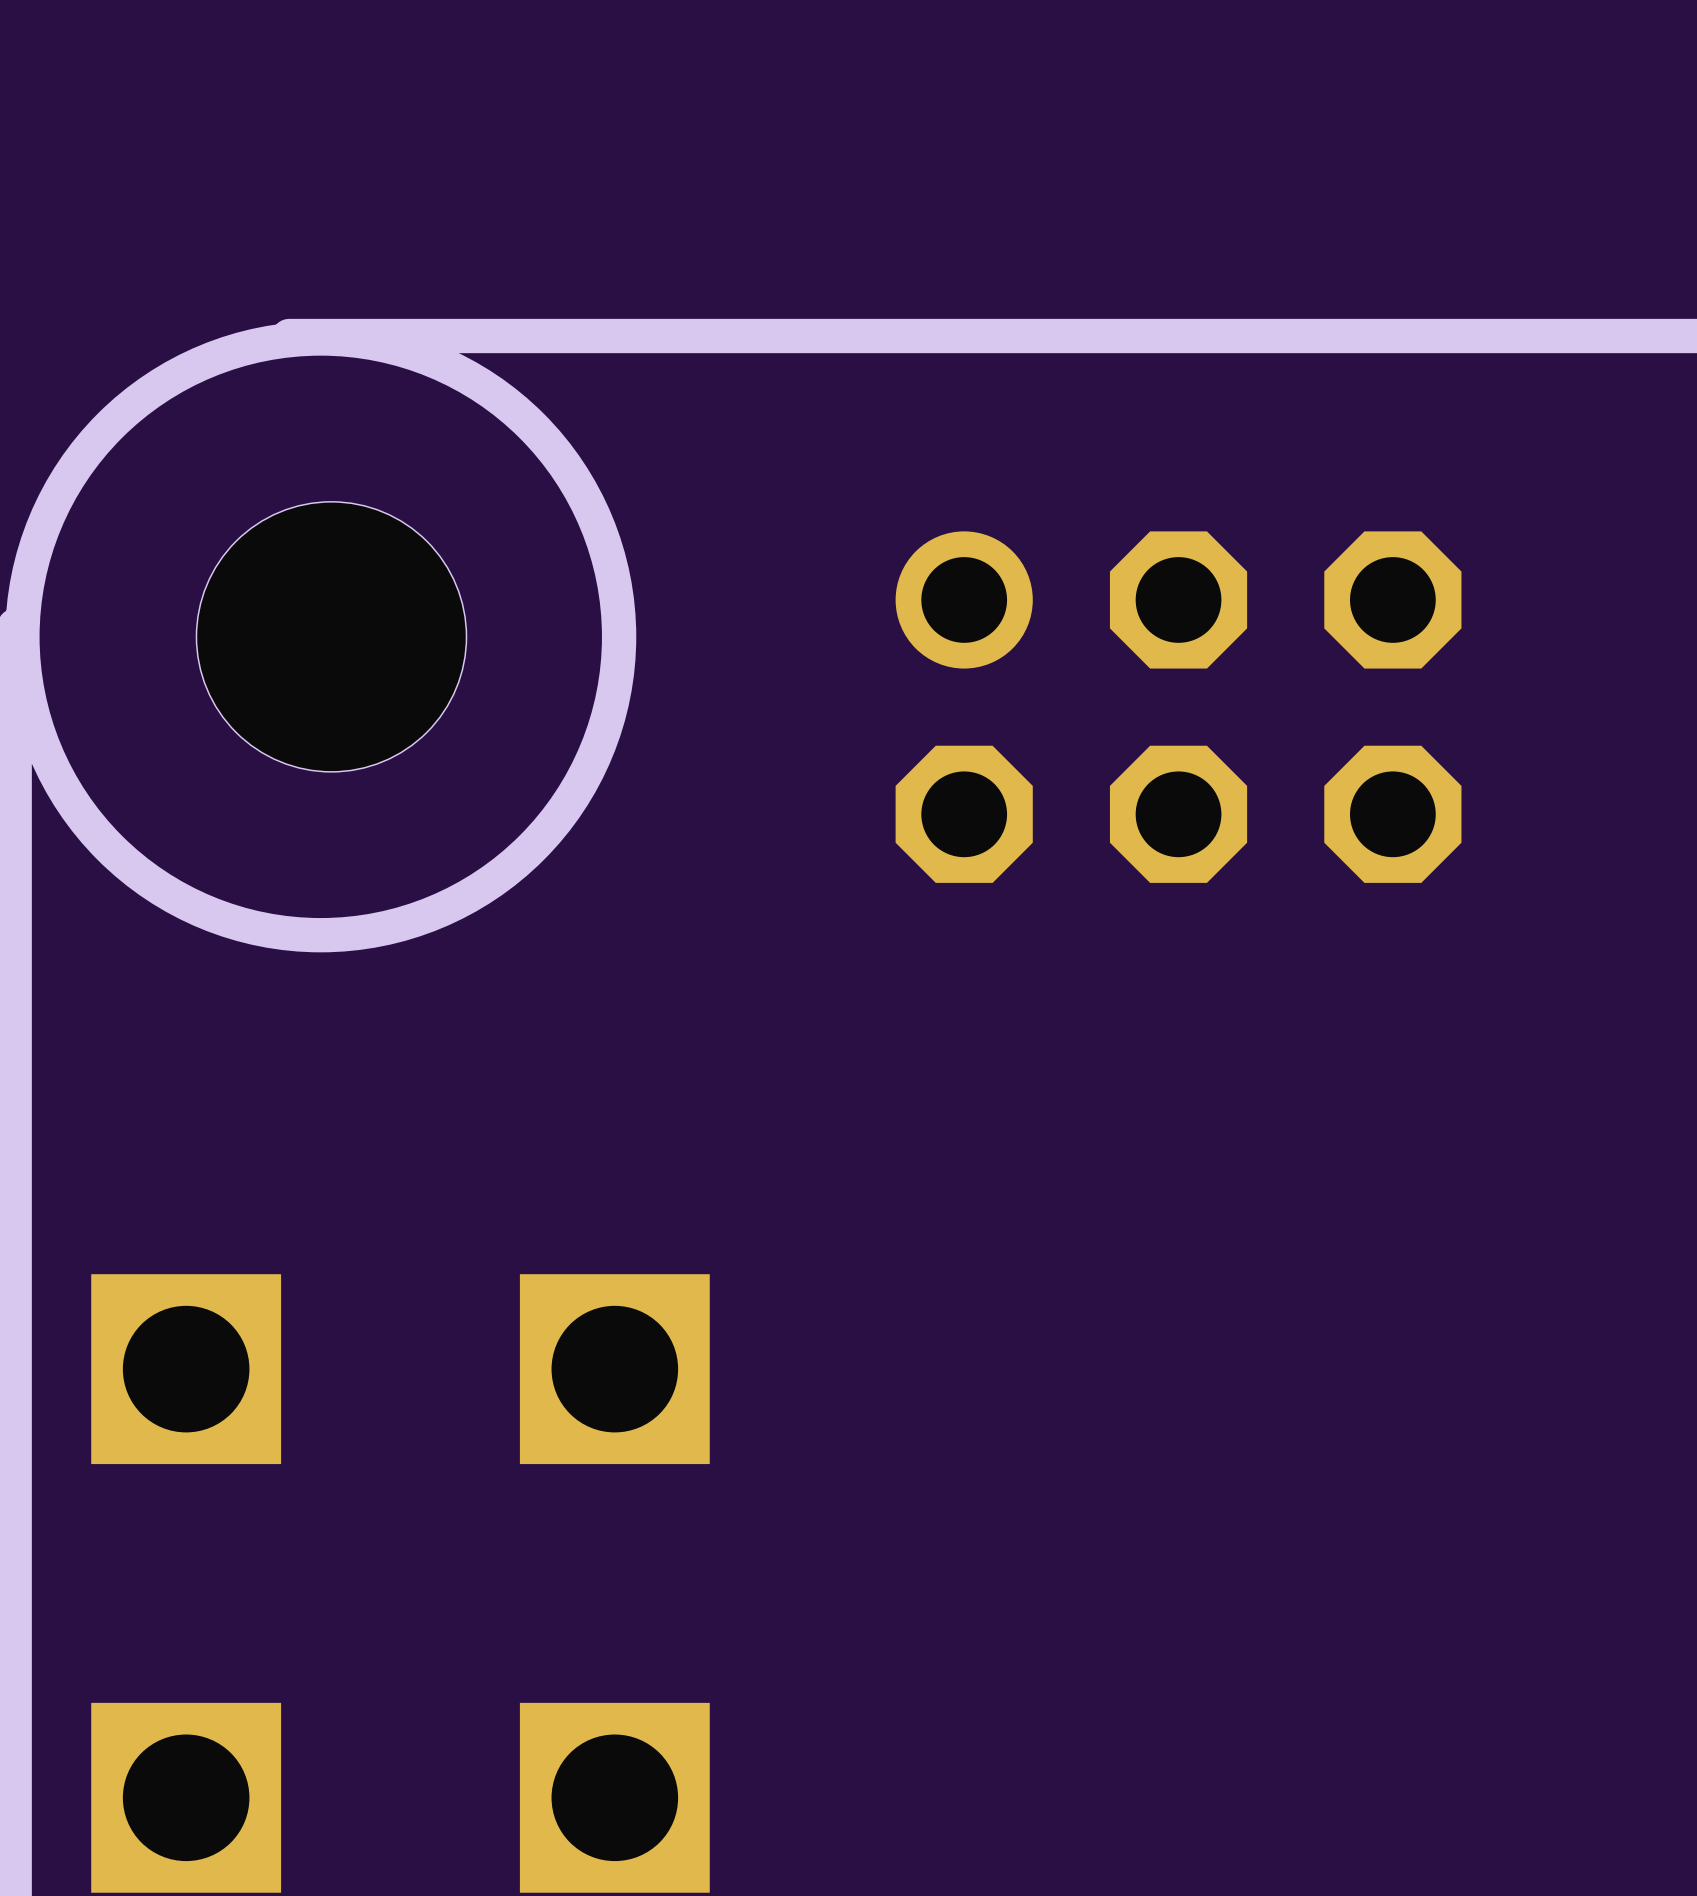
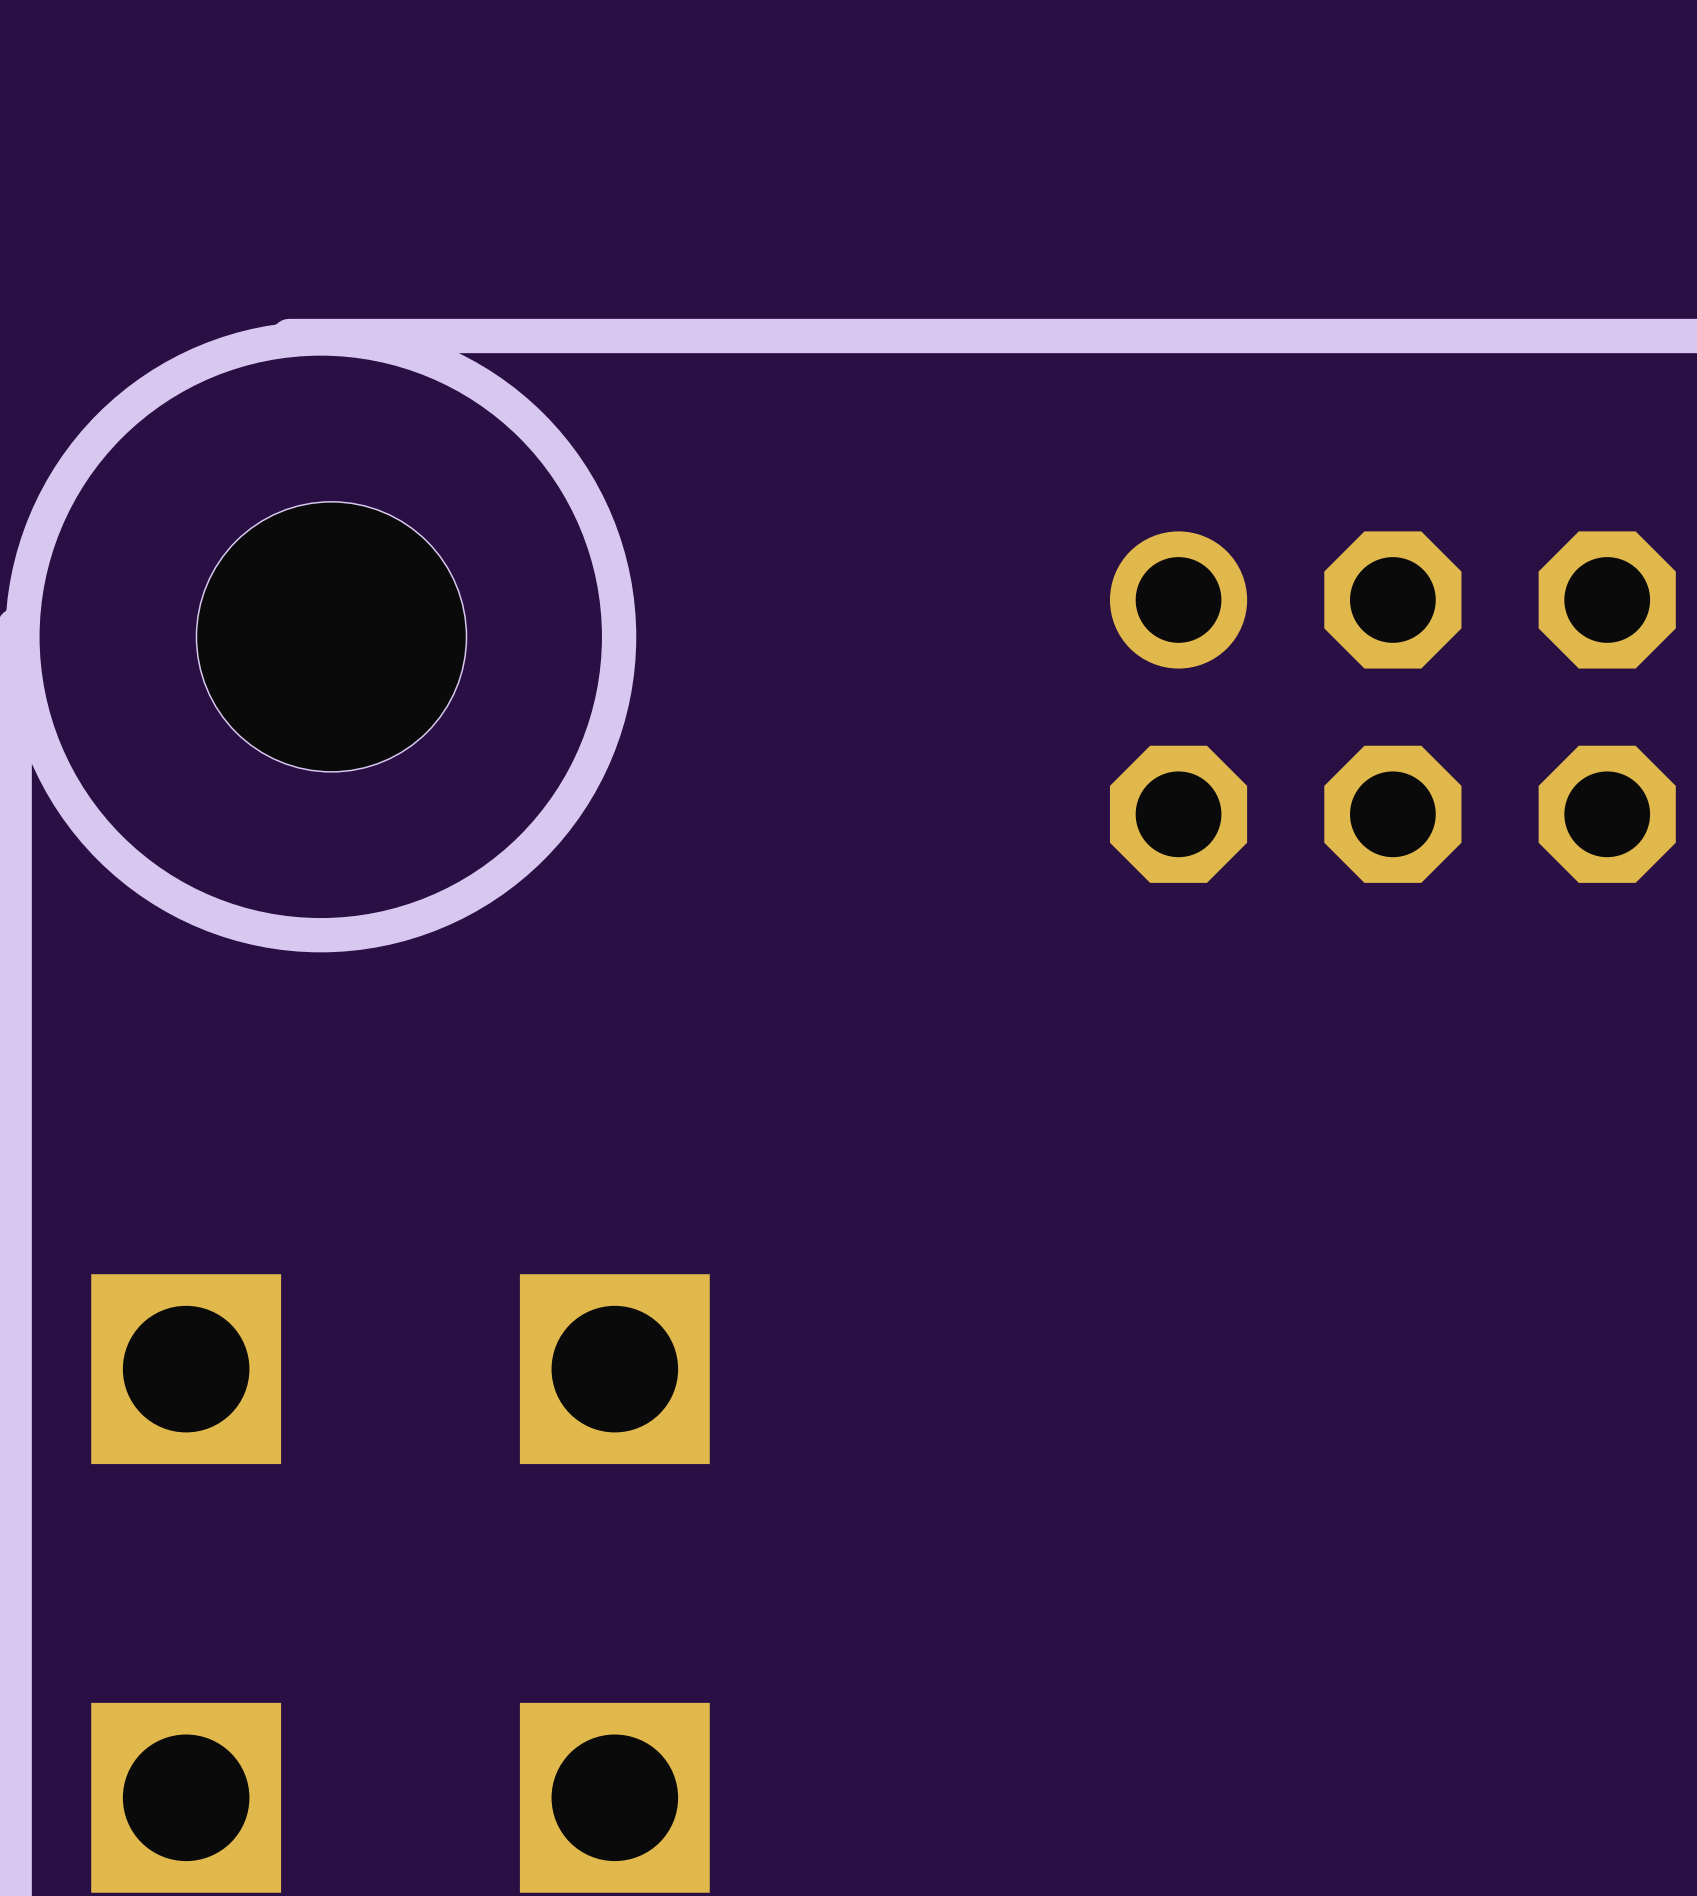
part position: (1178, 707) -> (1392, 707)

